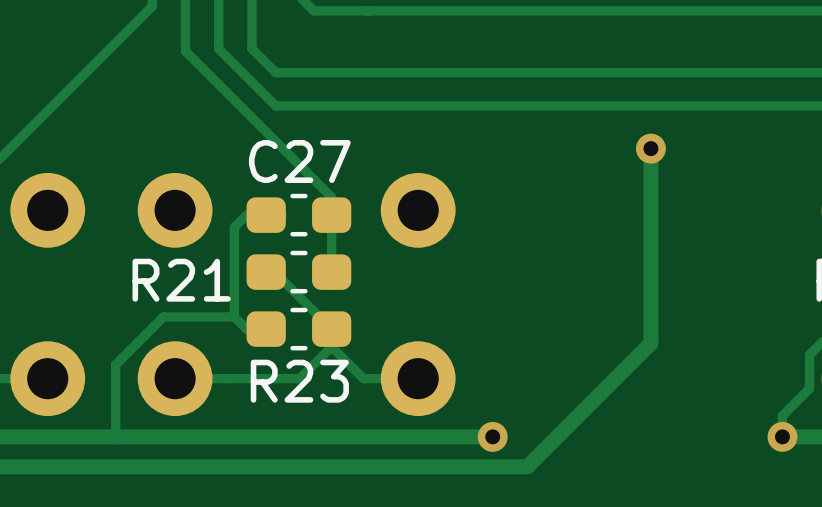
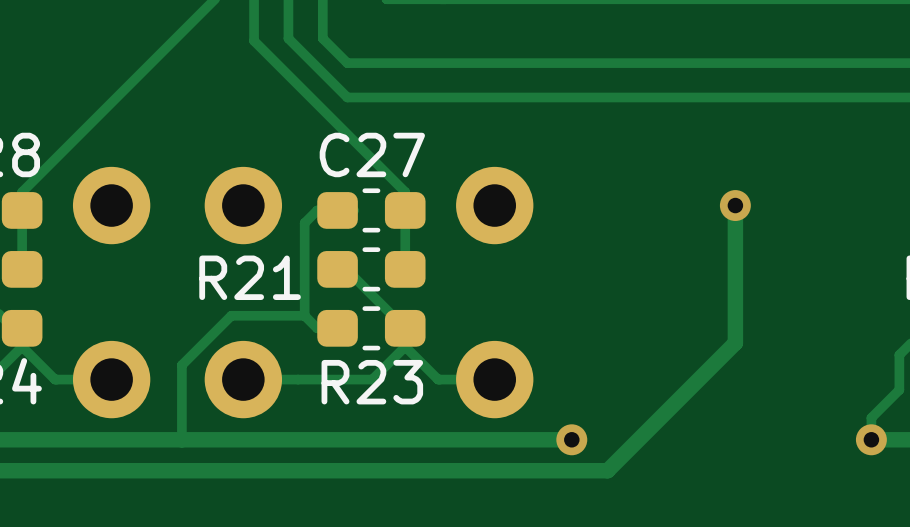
track: (650, 148) (650, 210) -> none
via position: (650, 148) -> (735, 205)

